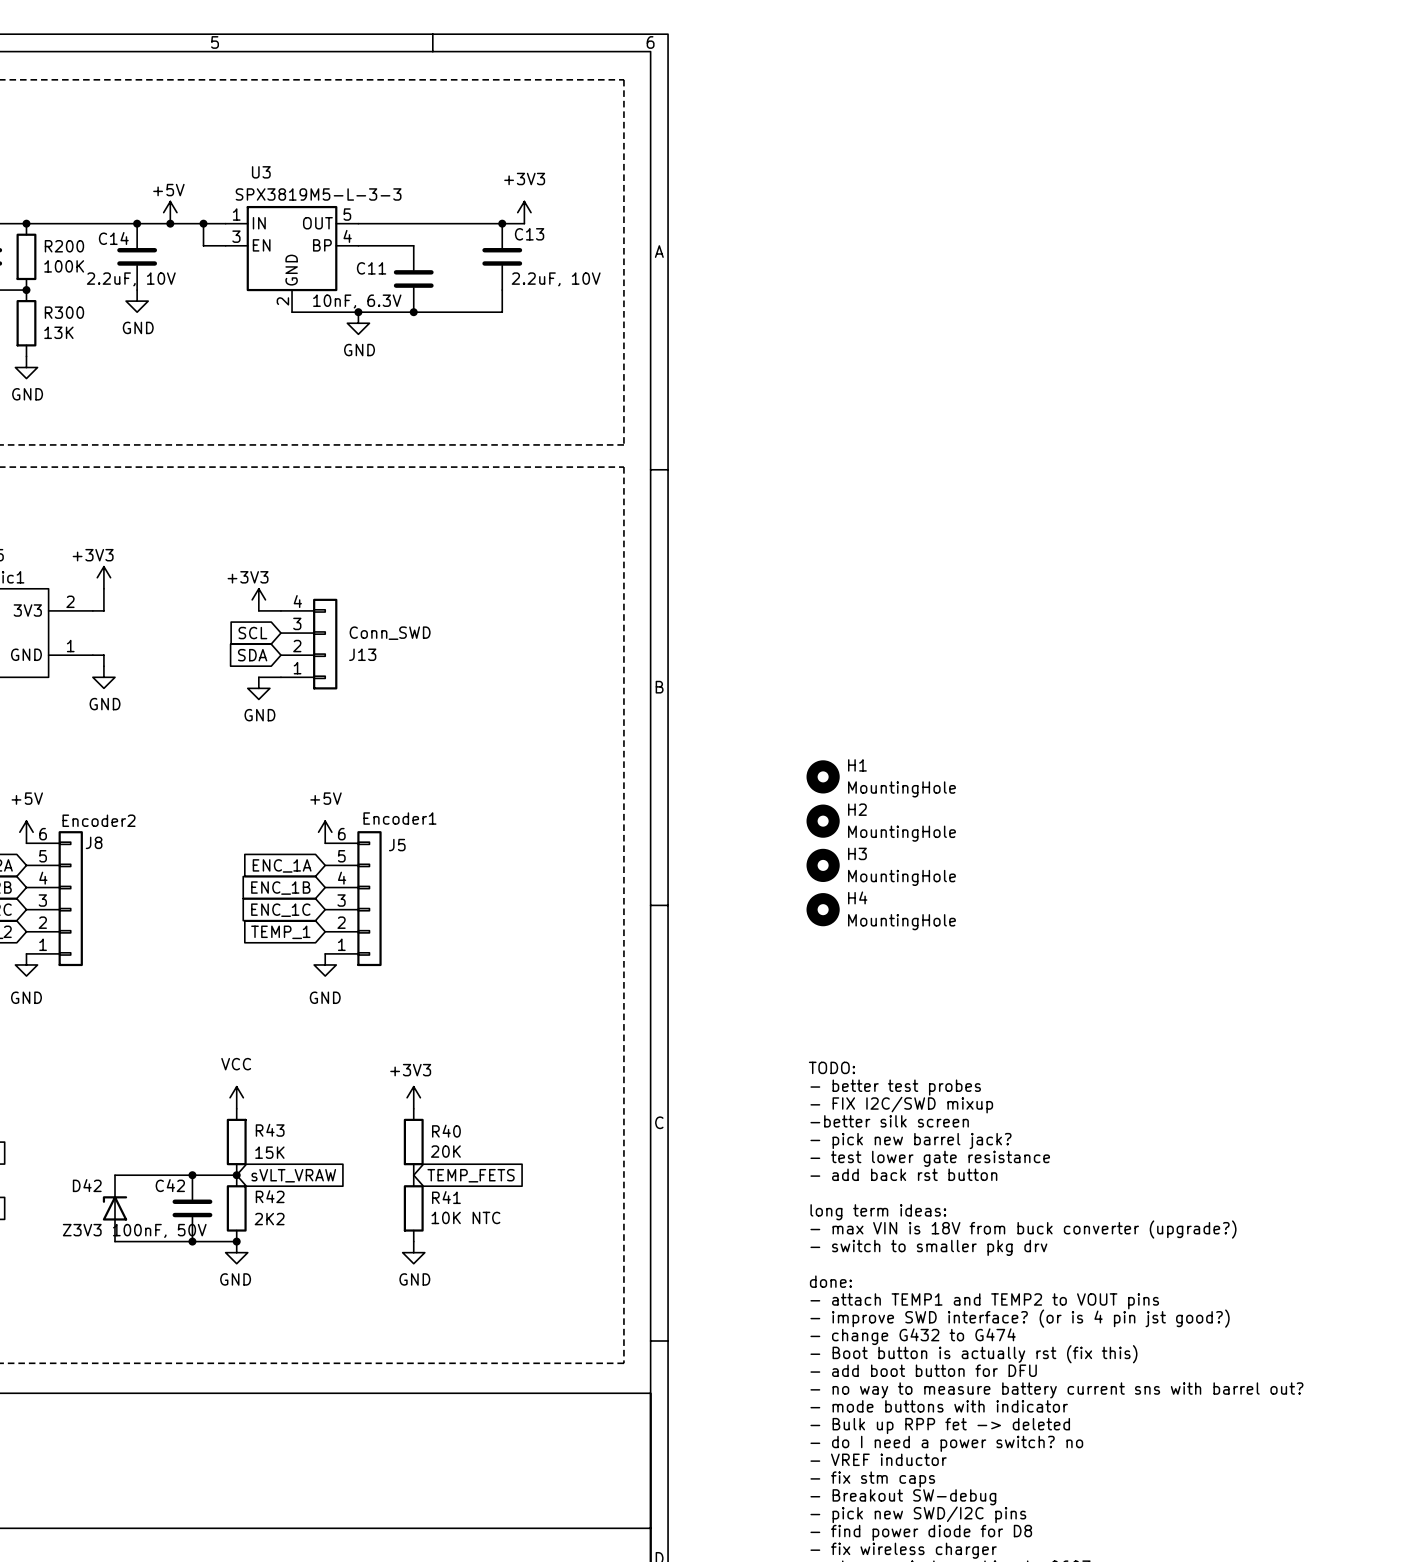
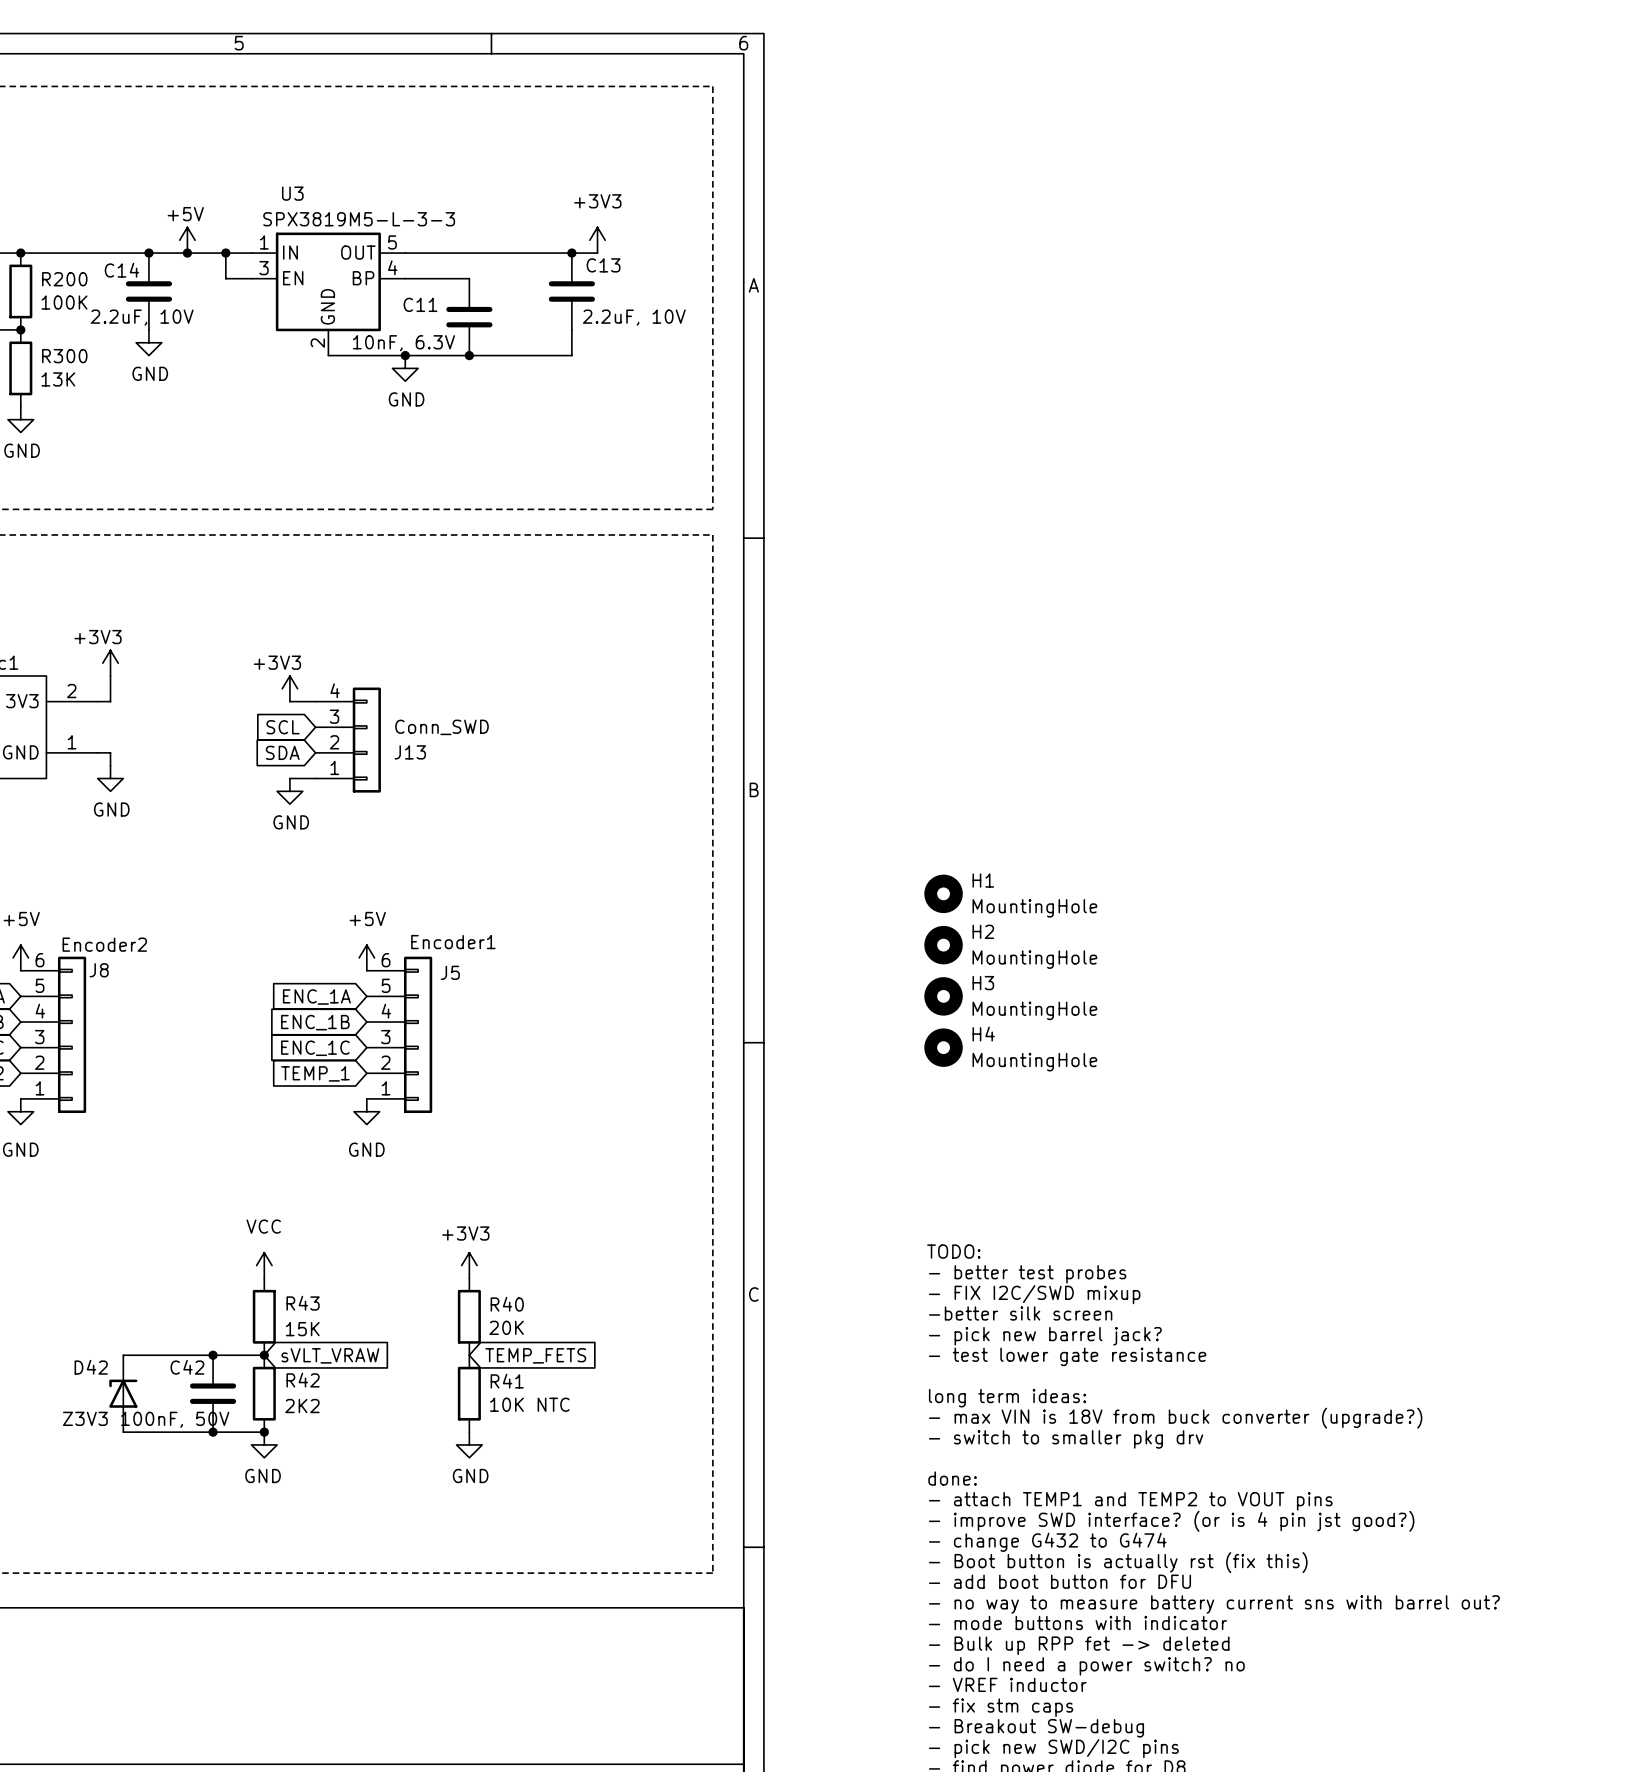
text: TODO: (831, 1067) -> none
text: - better test probes (895, 1087) -> TODO: (953, 1251)
text: - FIX I2C/SWD mixup (901, 1105) -> - better test probes (1027, 1274)
text: -better silk screen (889, 1121) -> - FIX I2C/SWD mixup (1034, 1294)
text: - pick new barrel jack? (910, 1140) -> -better silk screen (1020, 1313)
text: - test lower gate resistance (930, 1158) -> - pick new barrel jack? (1045, 1336)
text: - add back rst button (903, 1174) -> - test lower gate resistance (1067, 1356)

